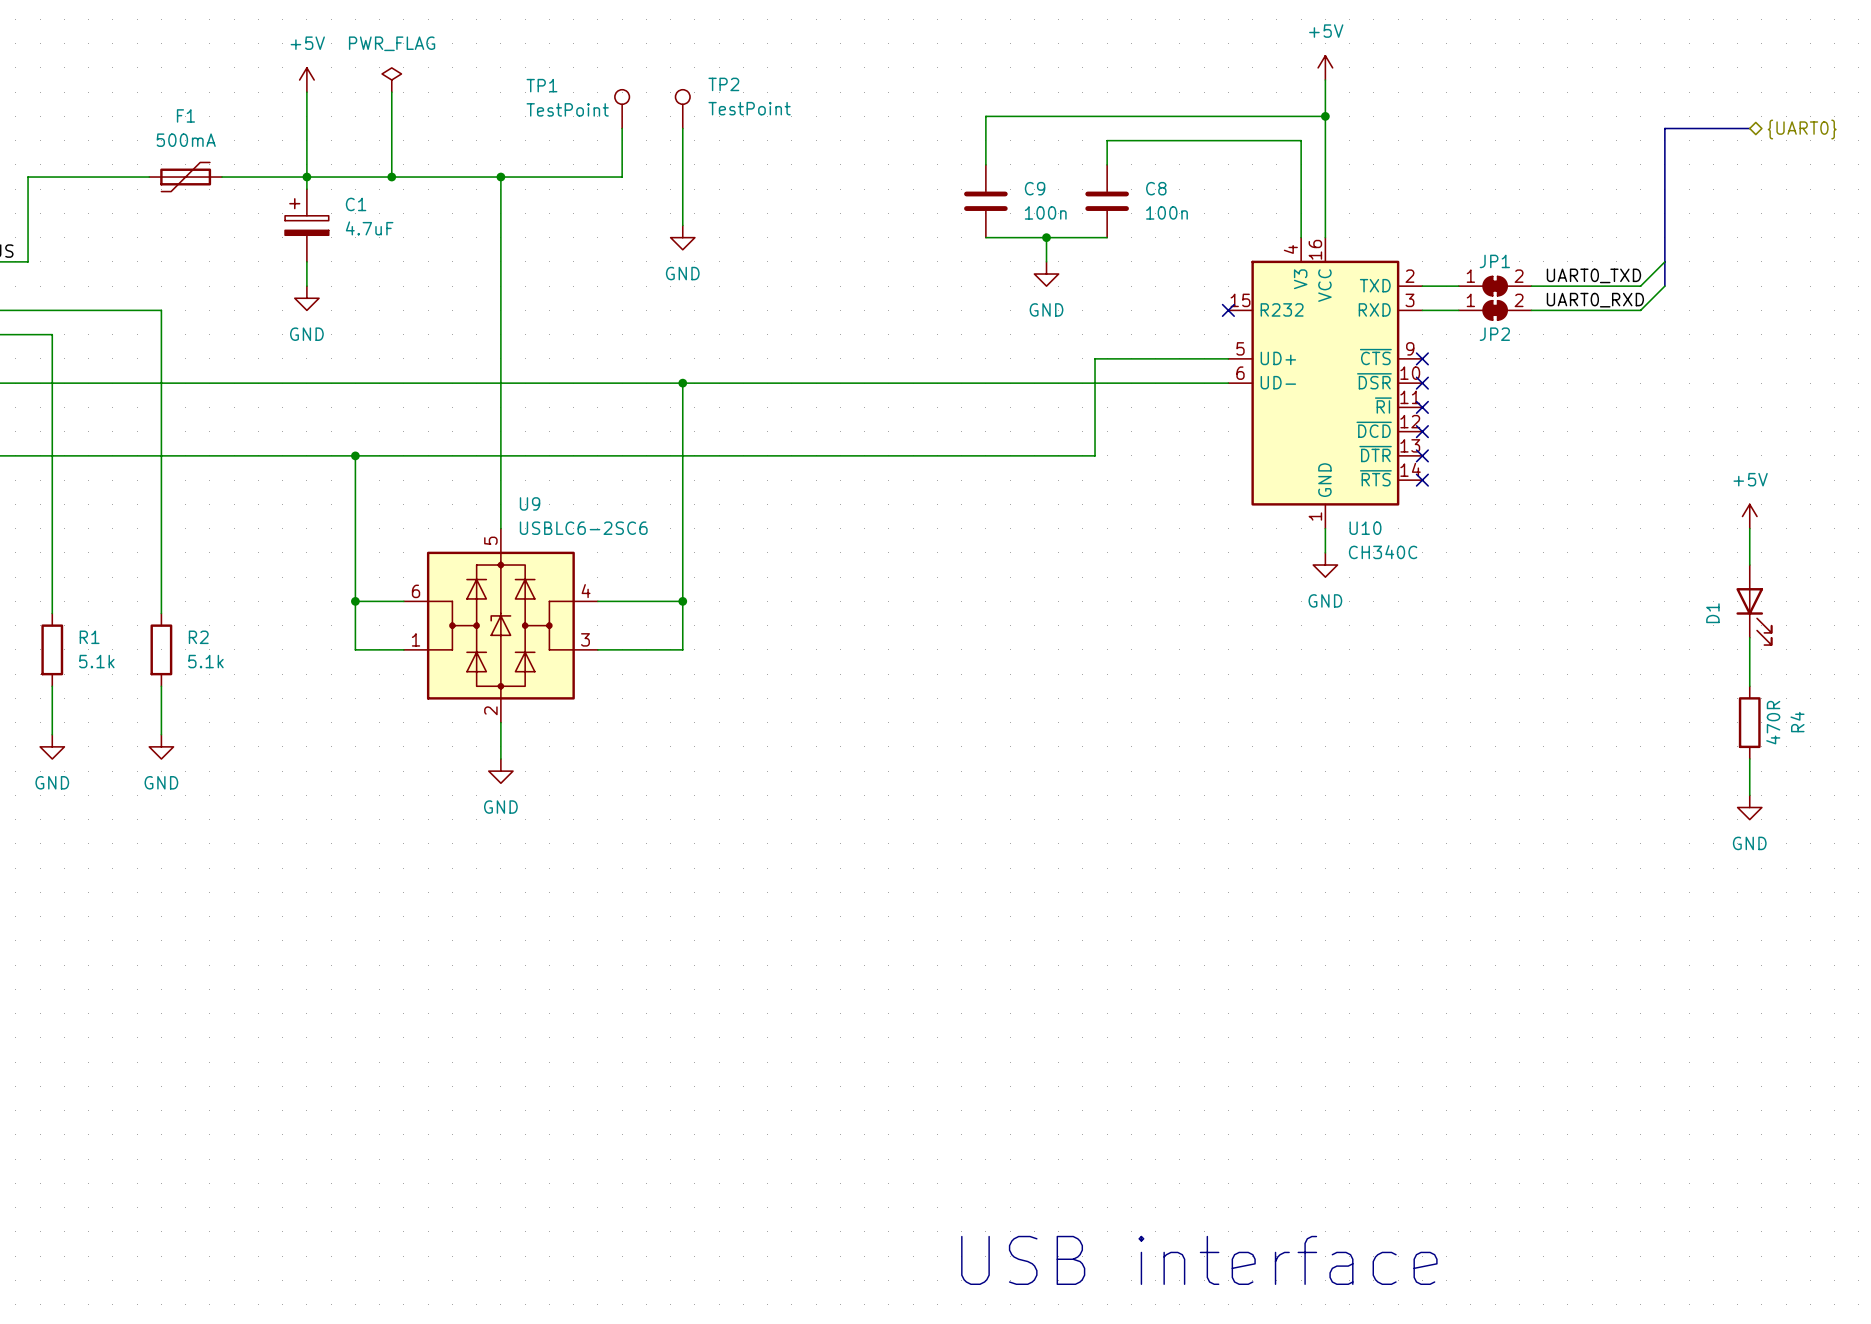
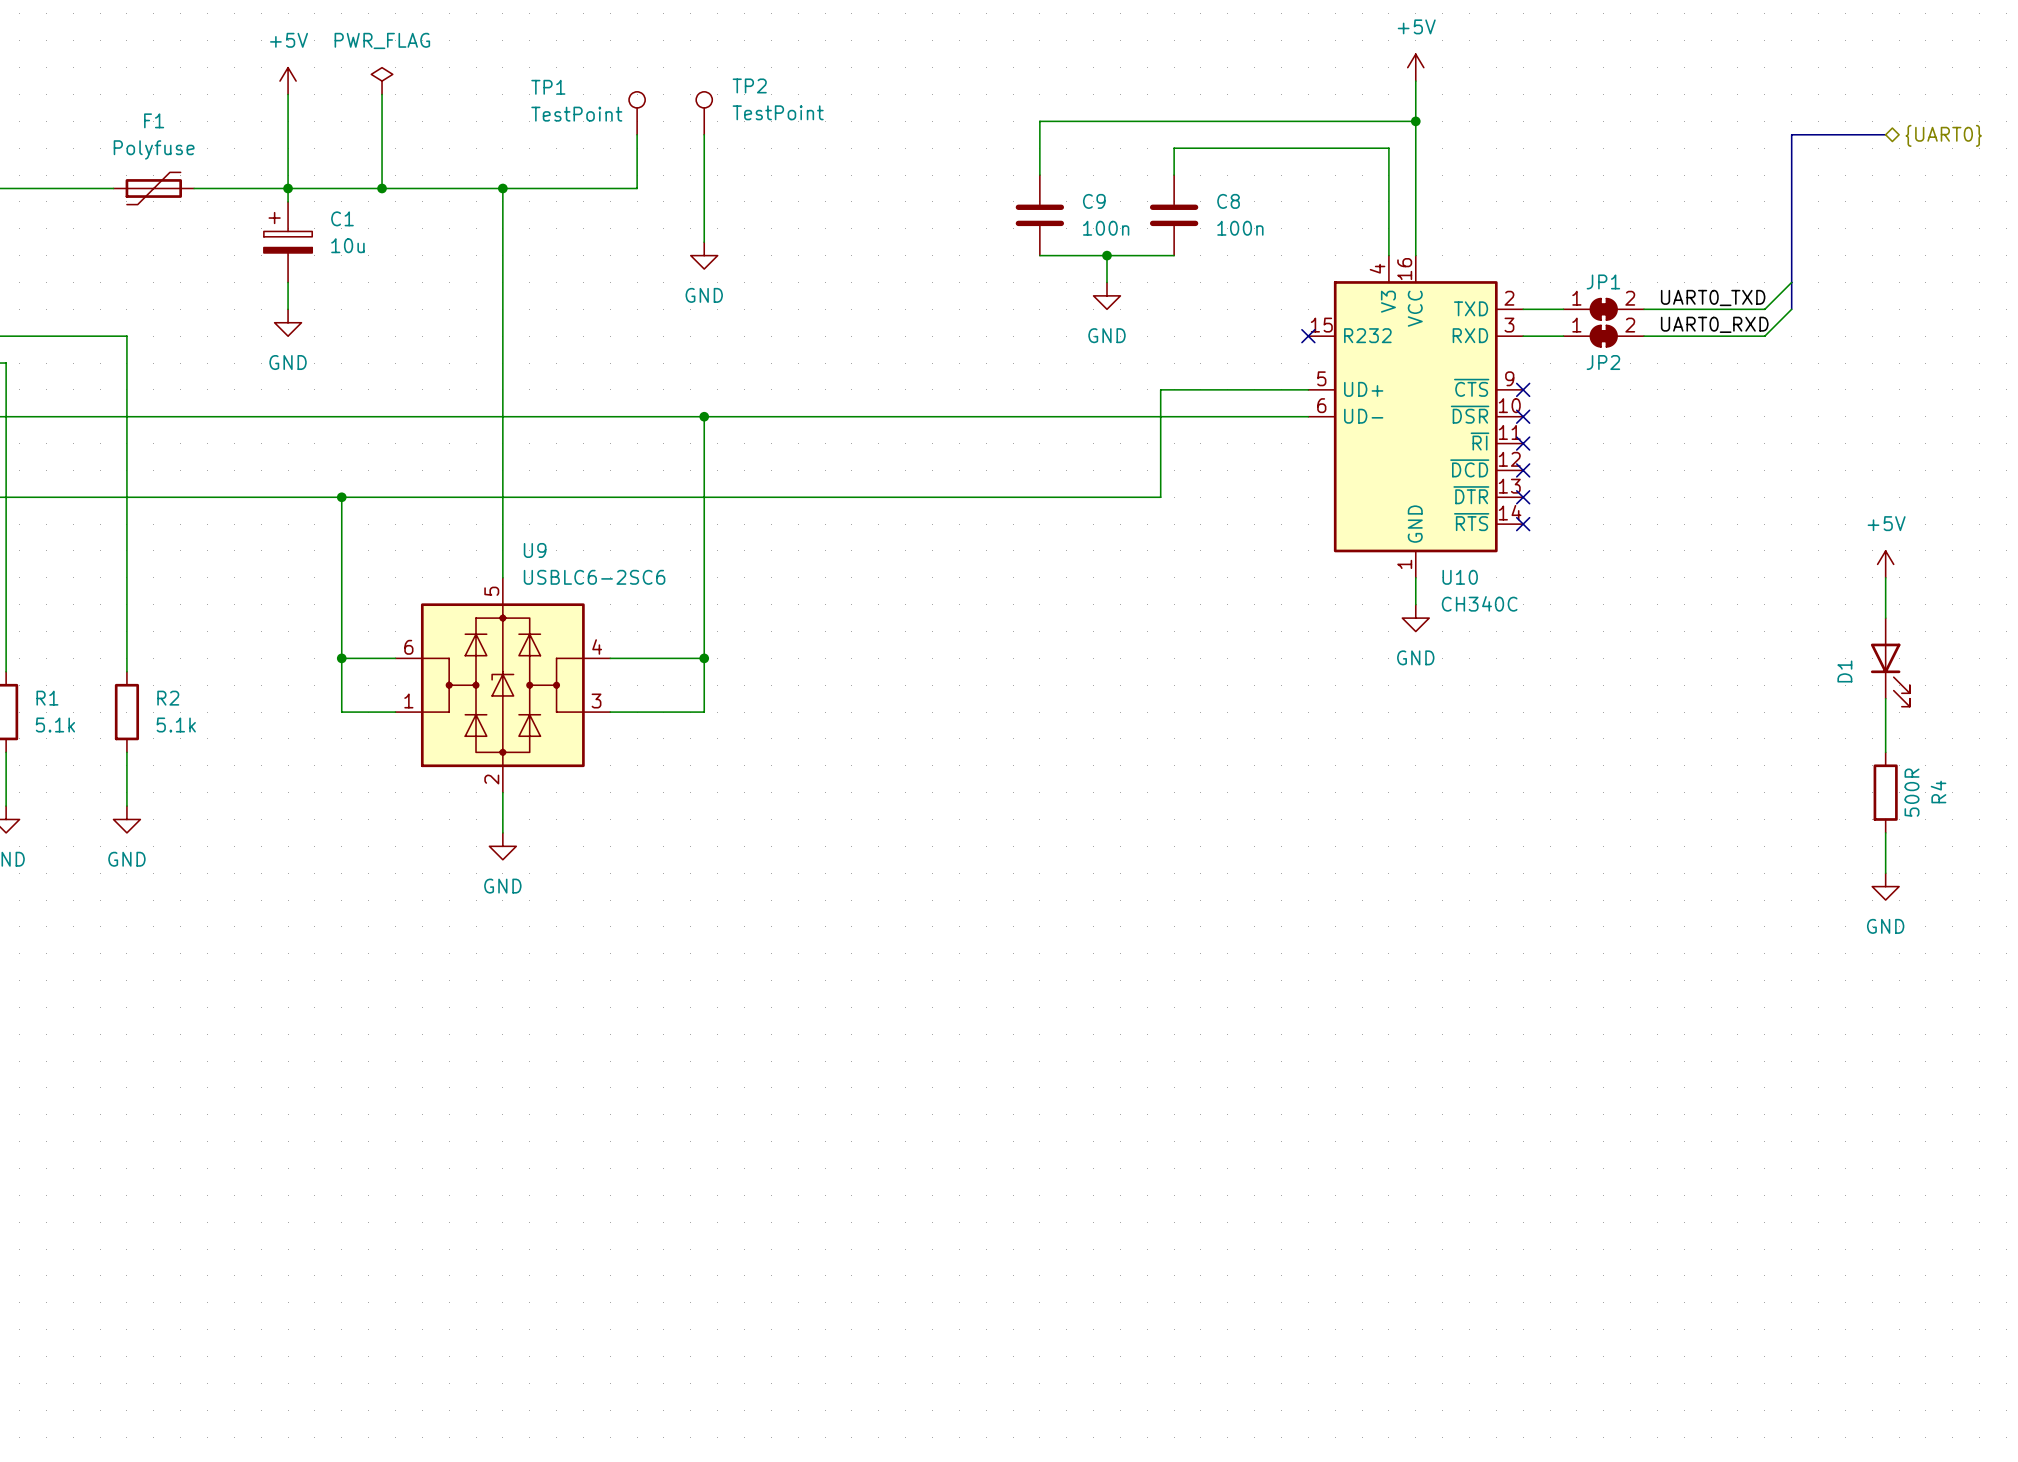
F1 value: 500mA (186, 140) -> Polyfuse (154, 149)
C1 value: 4.7uF (369, 228) -> 10u (347, 245)
R4 value: 470R (1773, 722) -> 500R (1912, 792)
text: USB interface (1199, 1260) -> none

